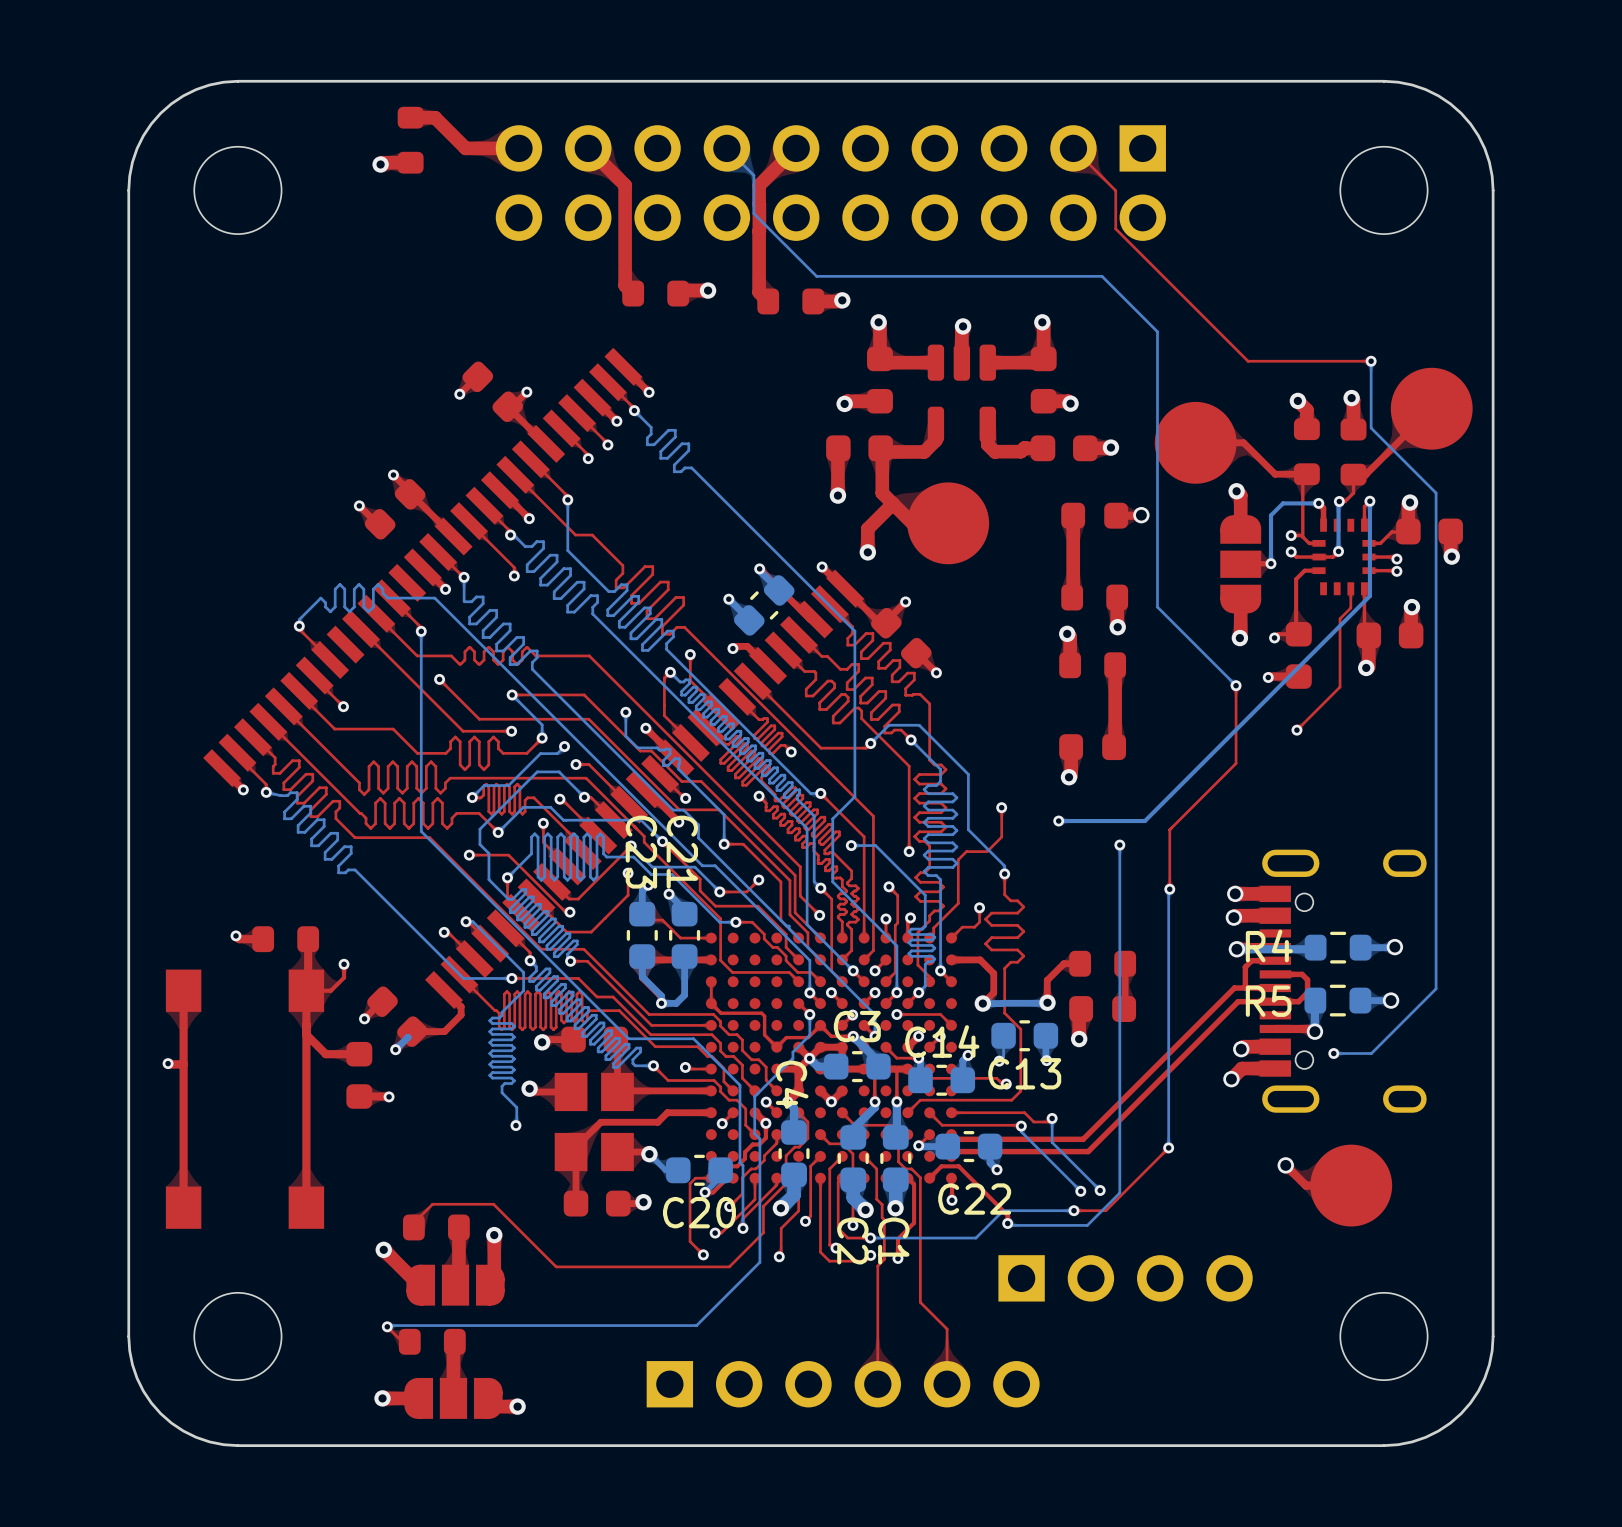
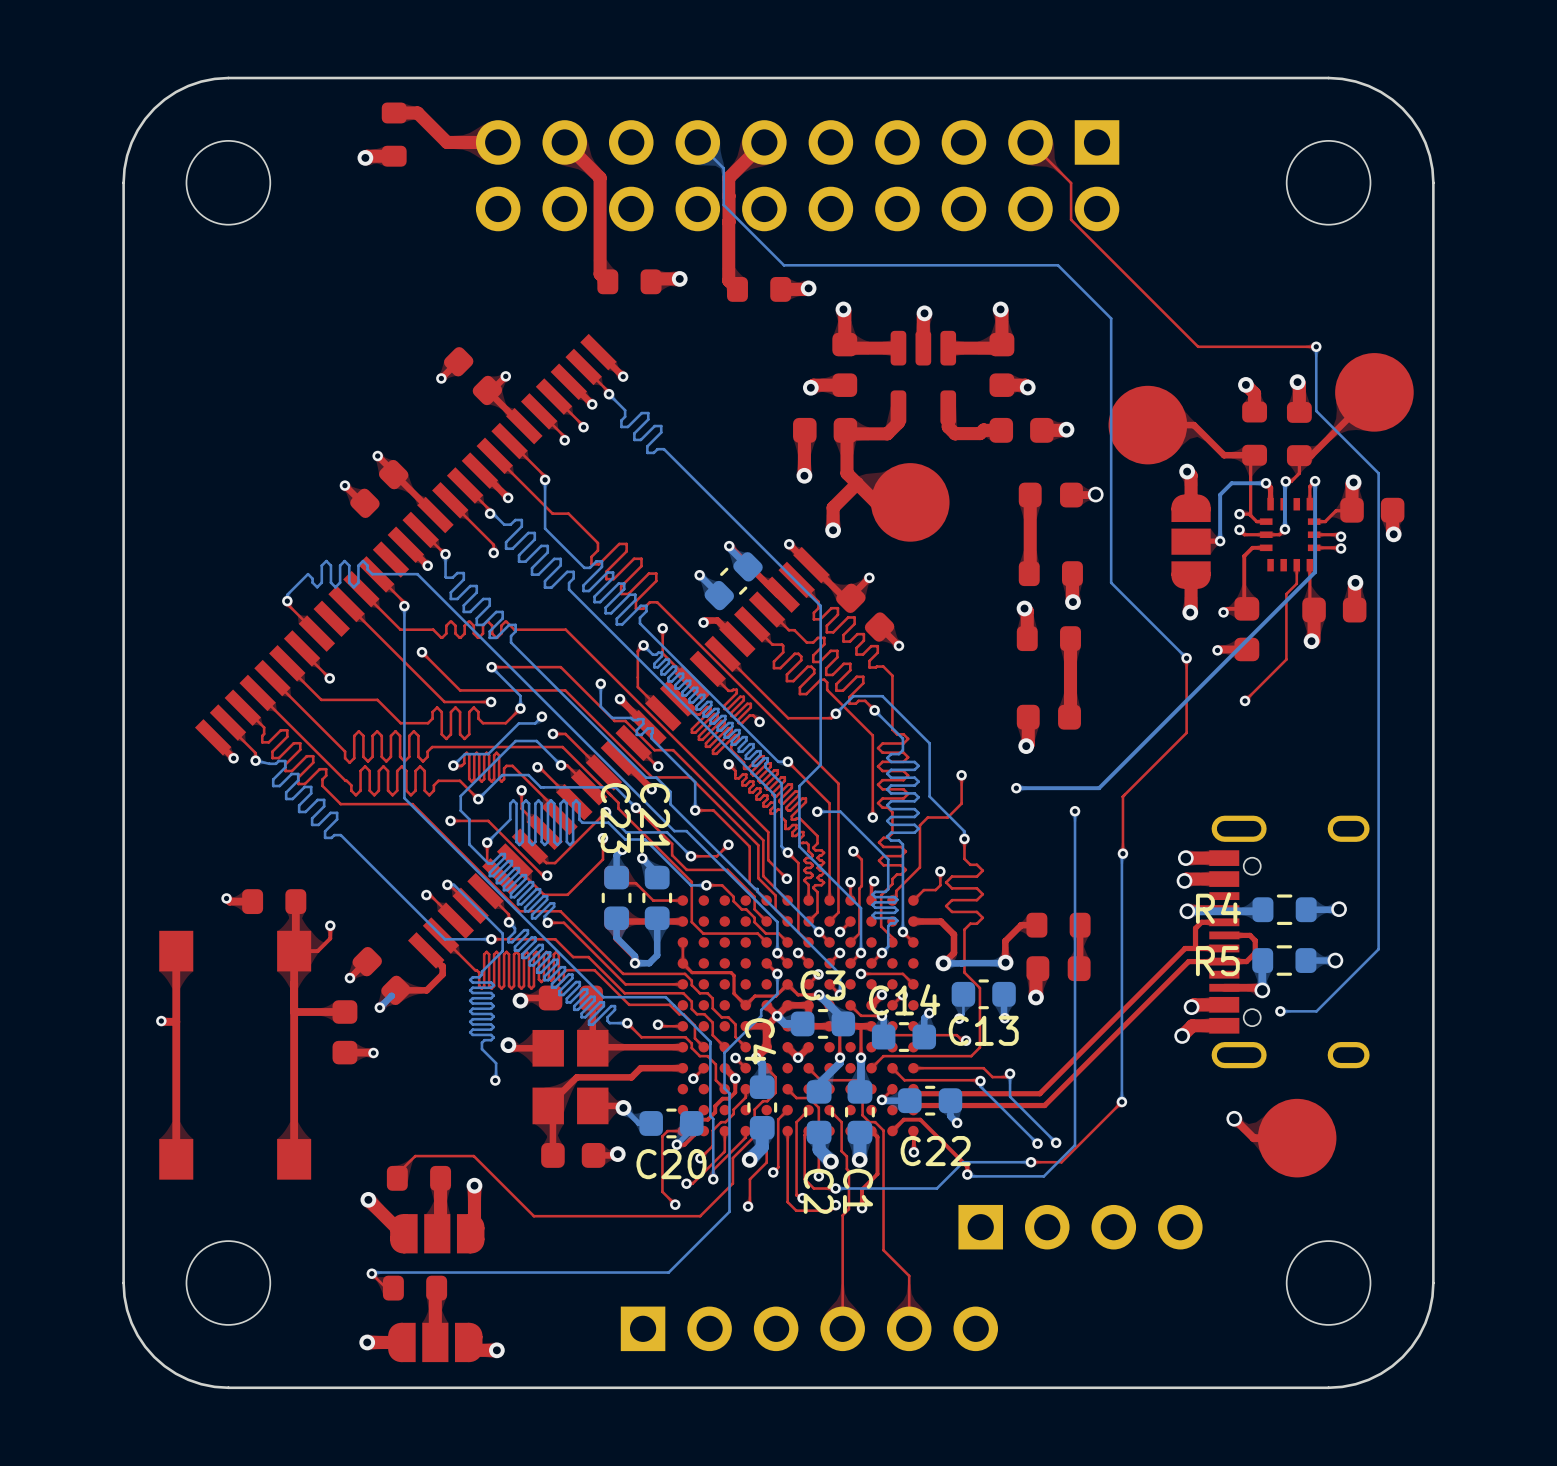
top track: (306, 1034) (325, 1054) -> (294, 1012) (312, 1012)

